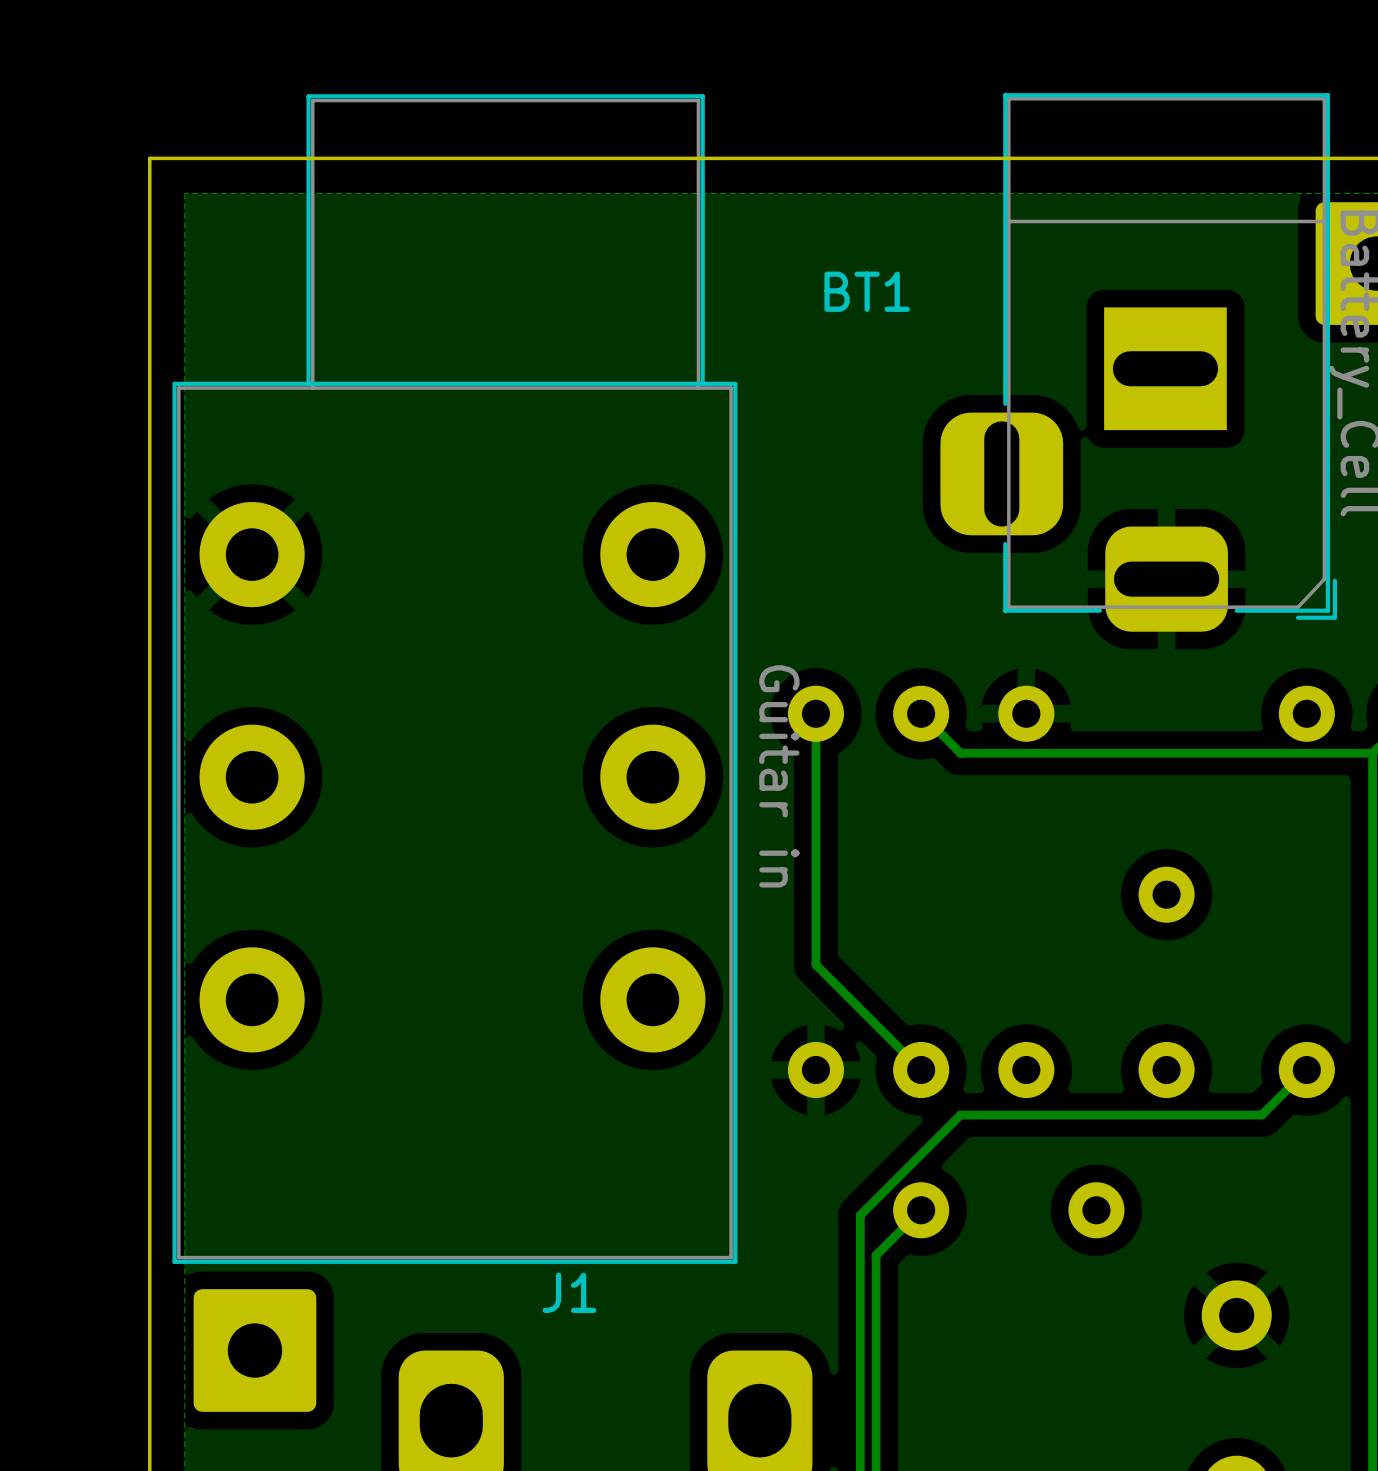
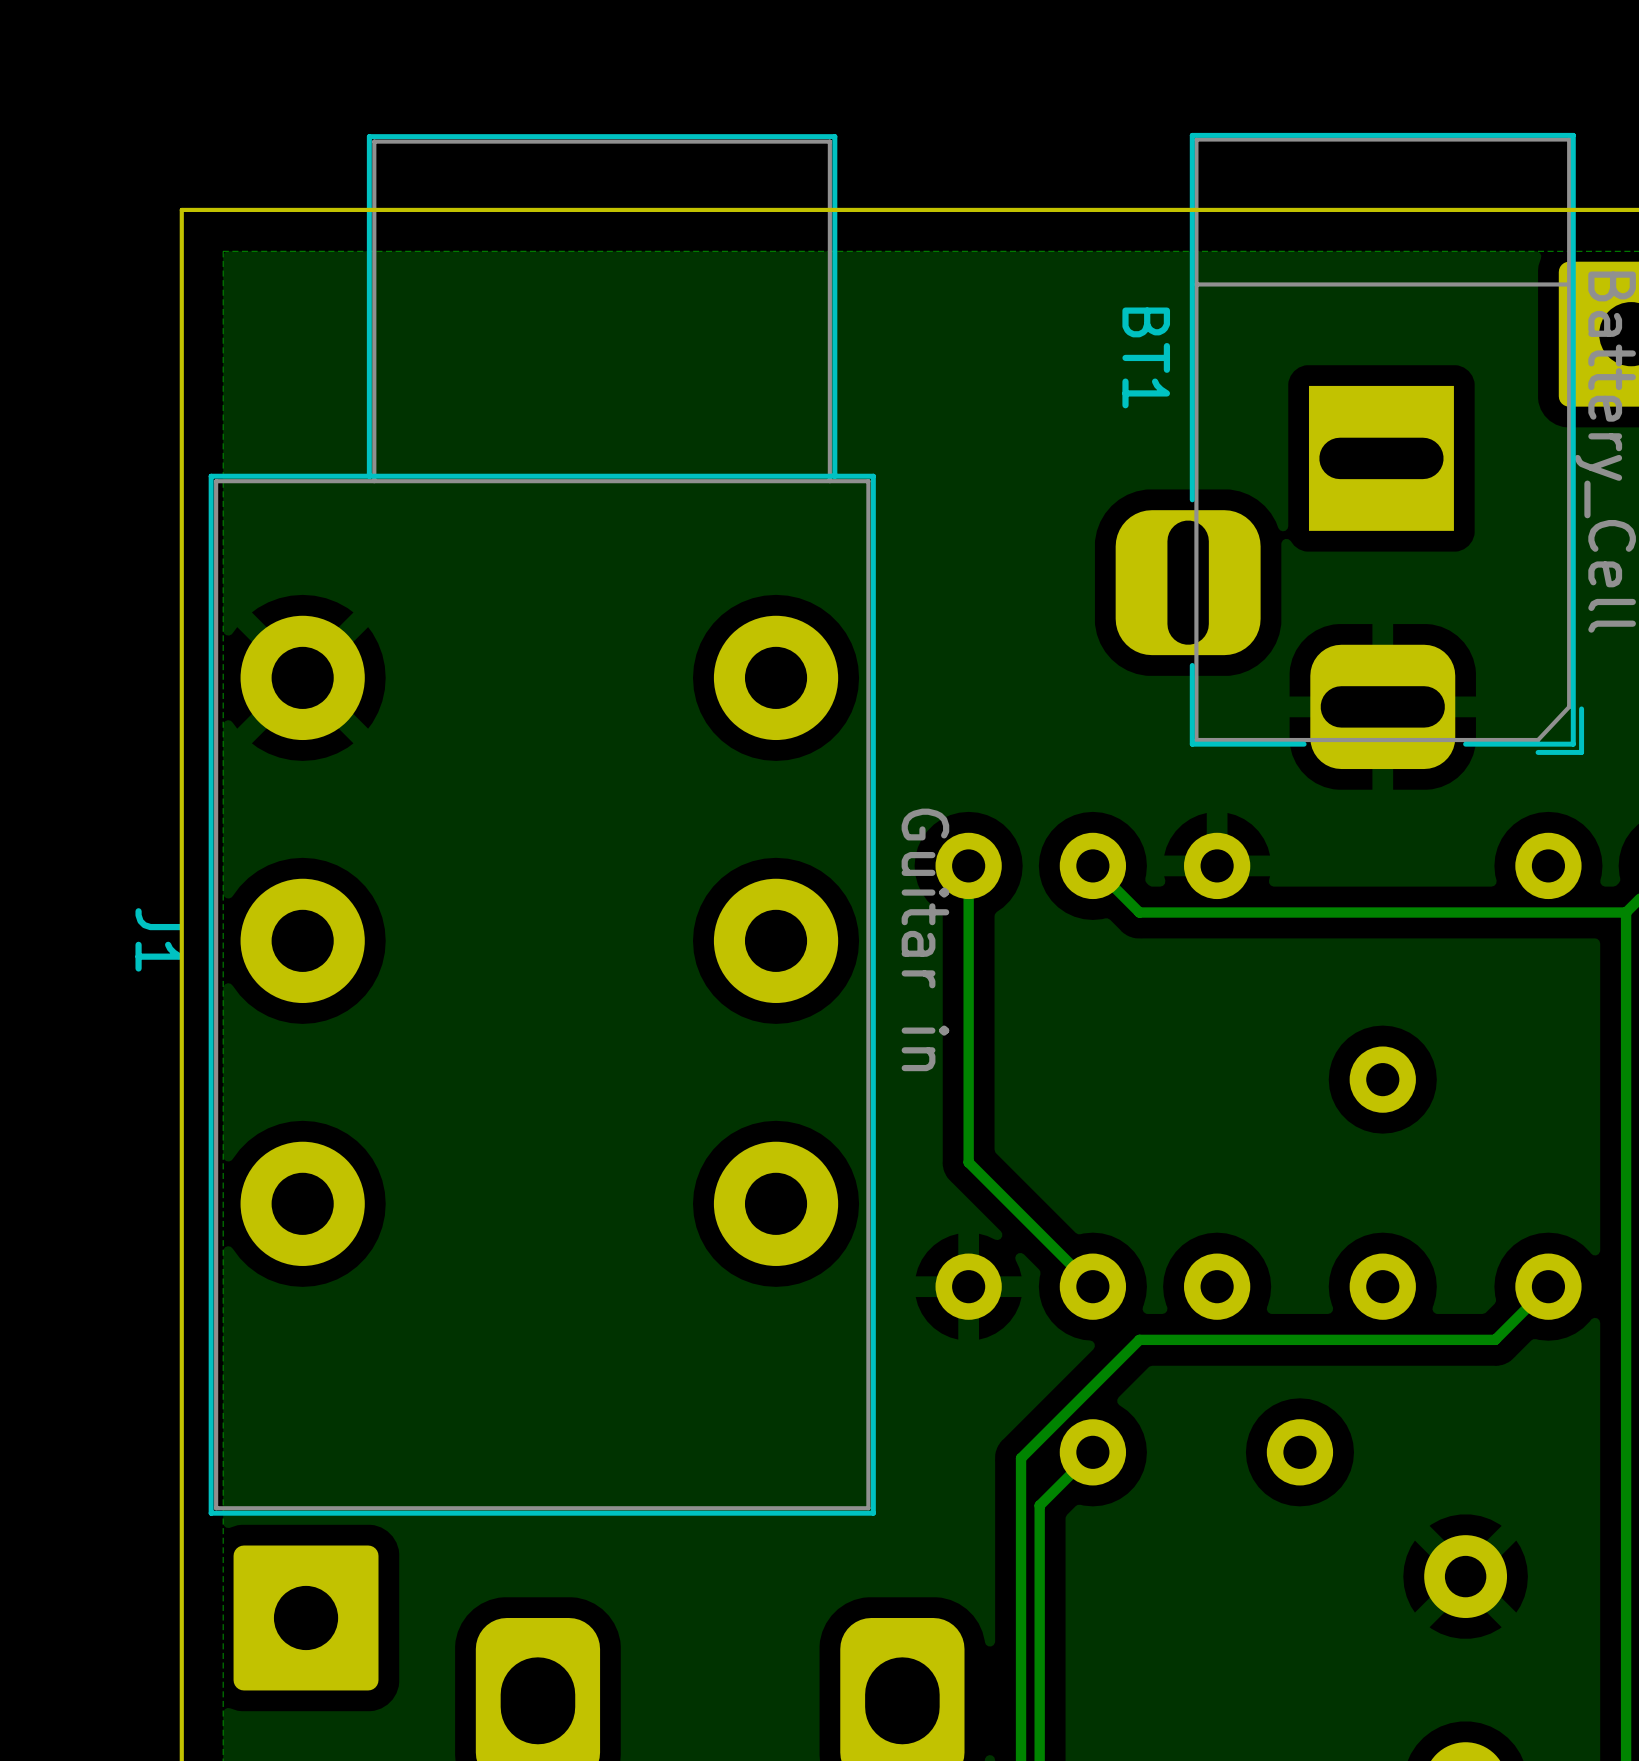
BT1 name rotation: 0° (867, 291) -> 90° clockwise (1146, 357)
J1 name rotation: 0° (569, 1292) -> 90° clockwise (159, 939)
J1 name position: J1 (569, 1292) -> J1 (159, 939)

